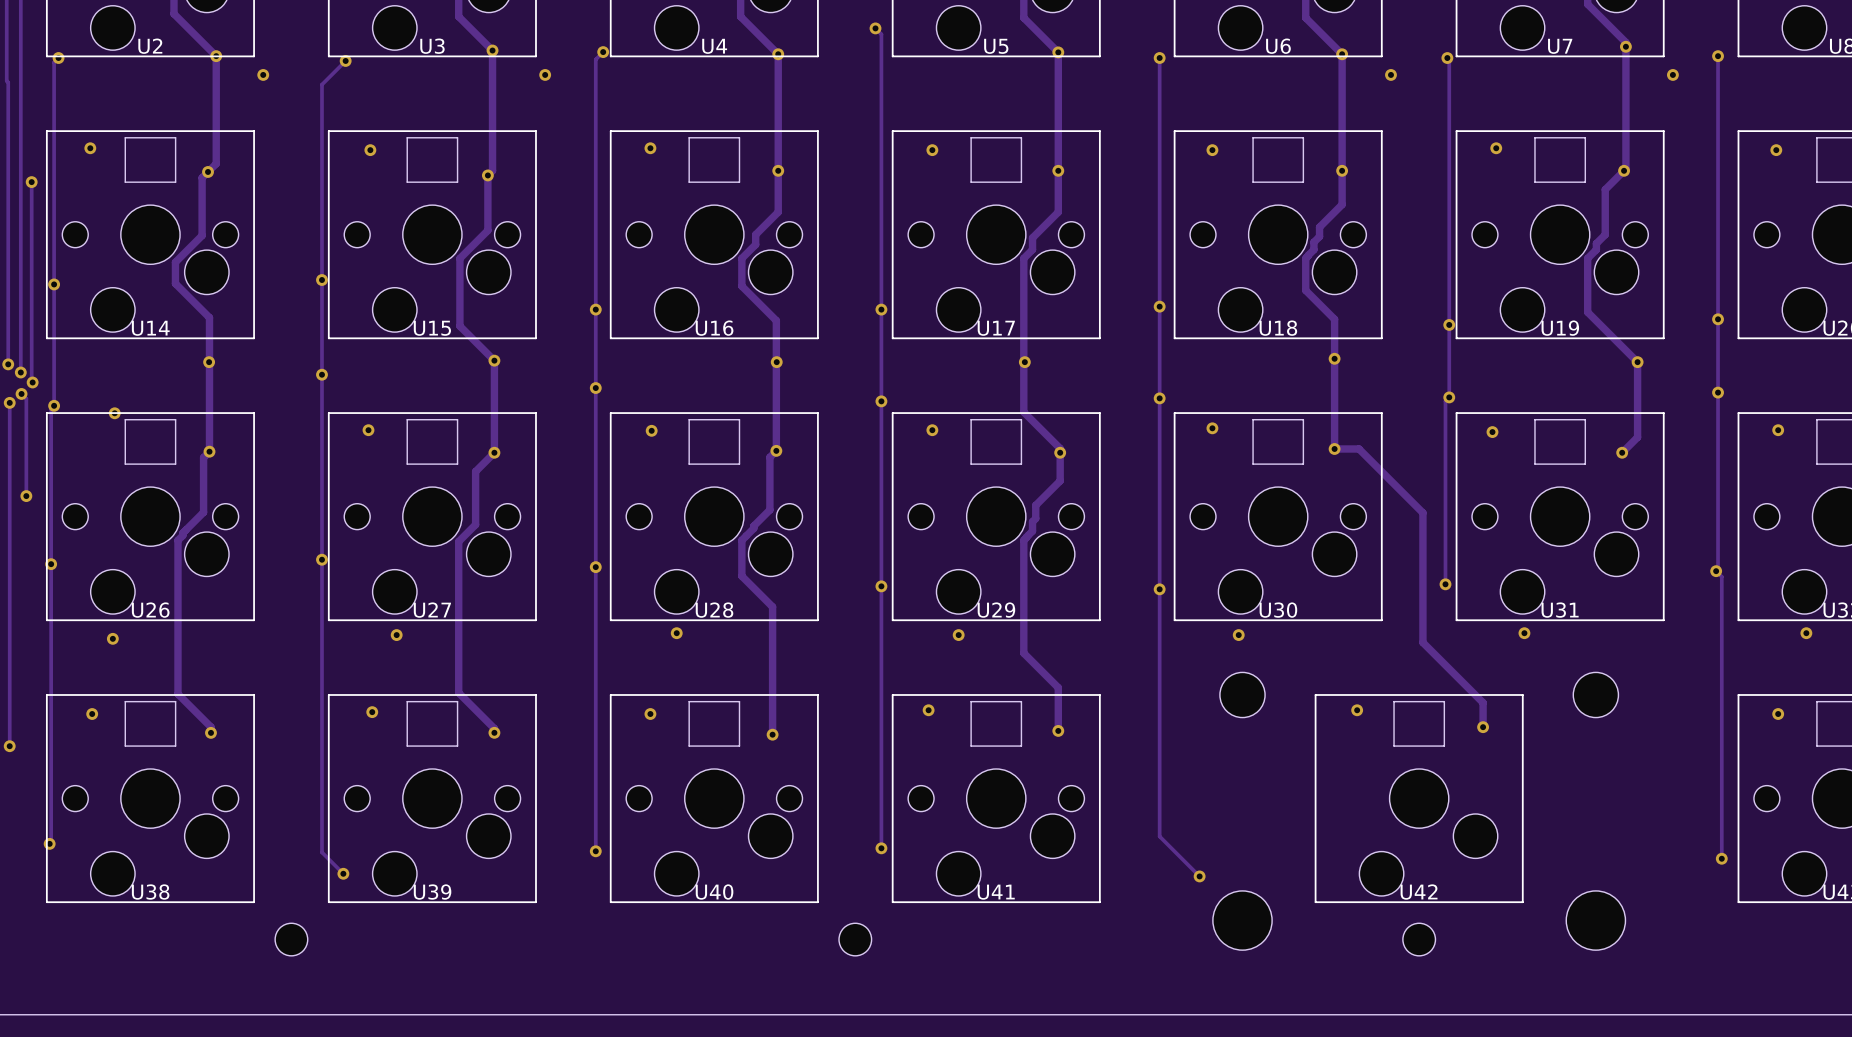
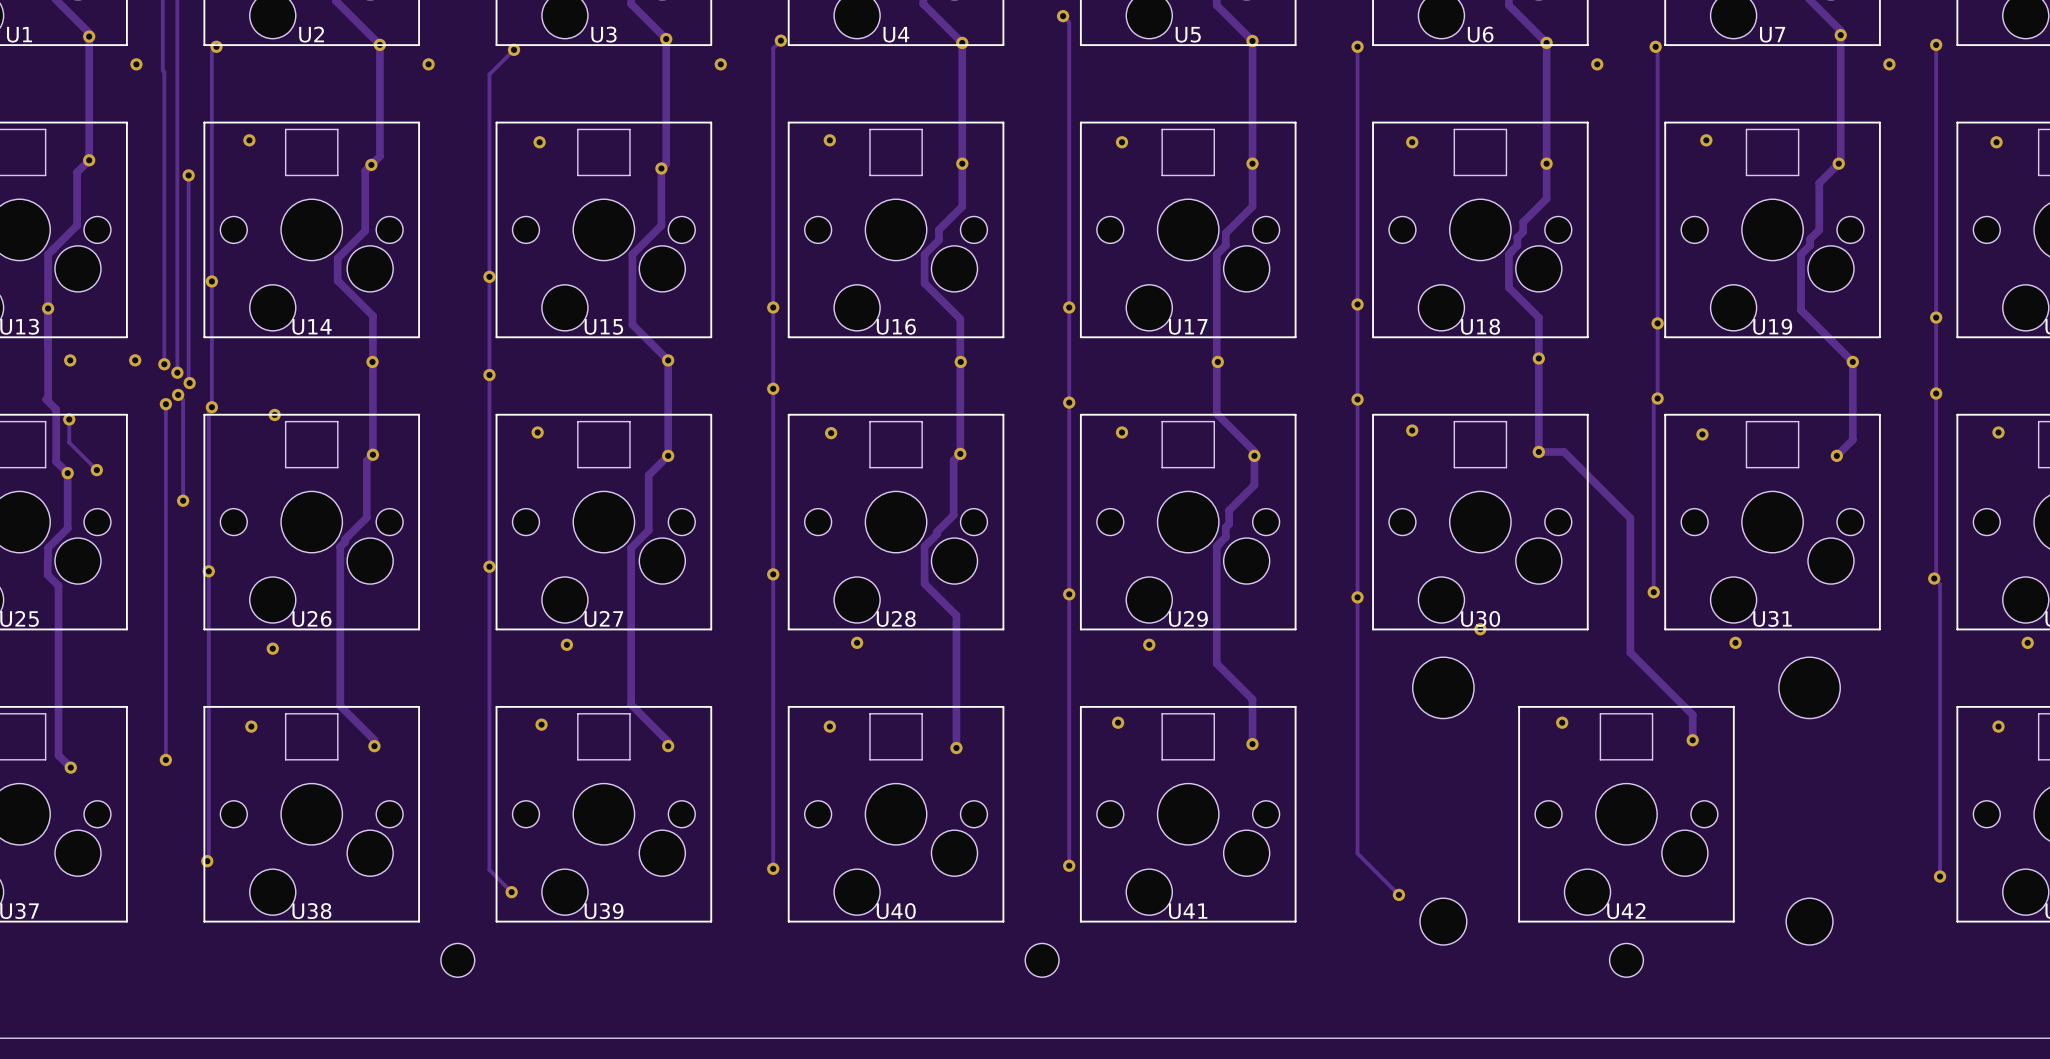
via position: (1238, 635) -> (1480, 629)
U42 footprint: [1212, 672, 1626, 951] -> [1412, 657, 1841, 946]

